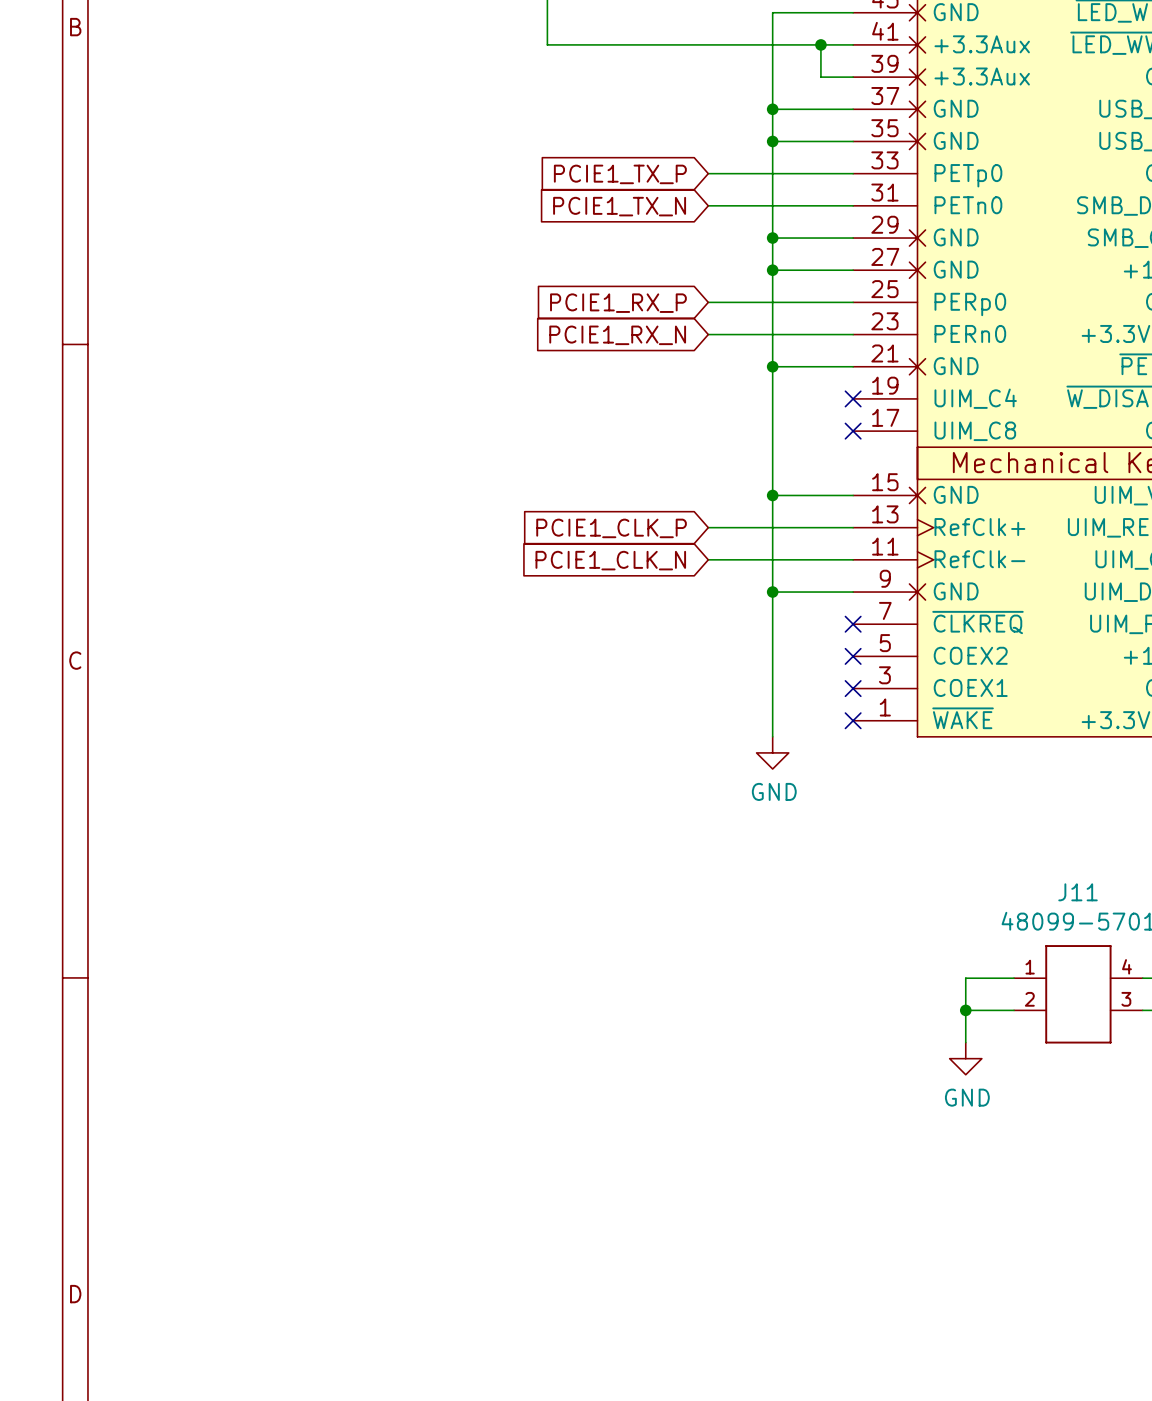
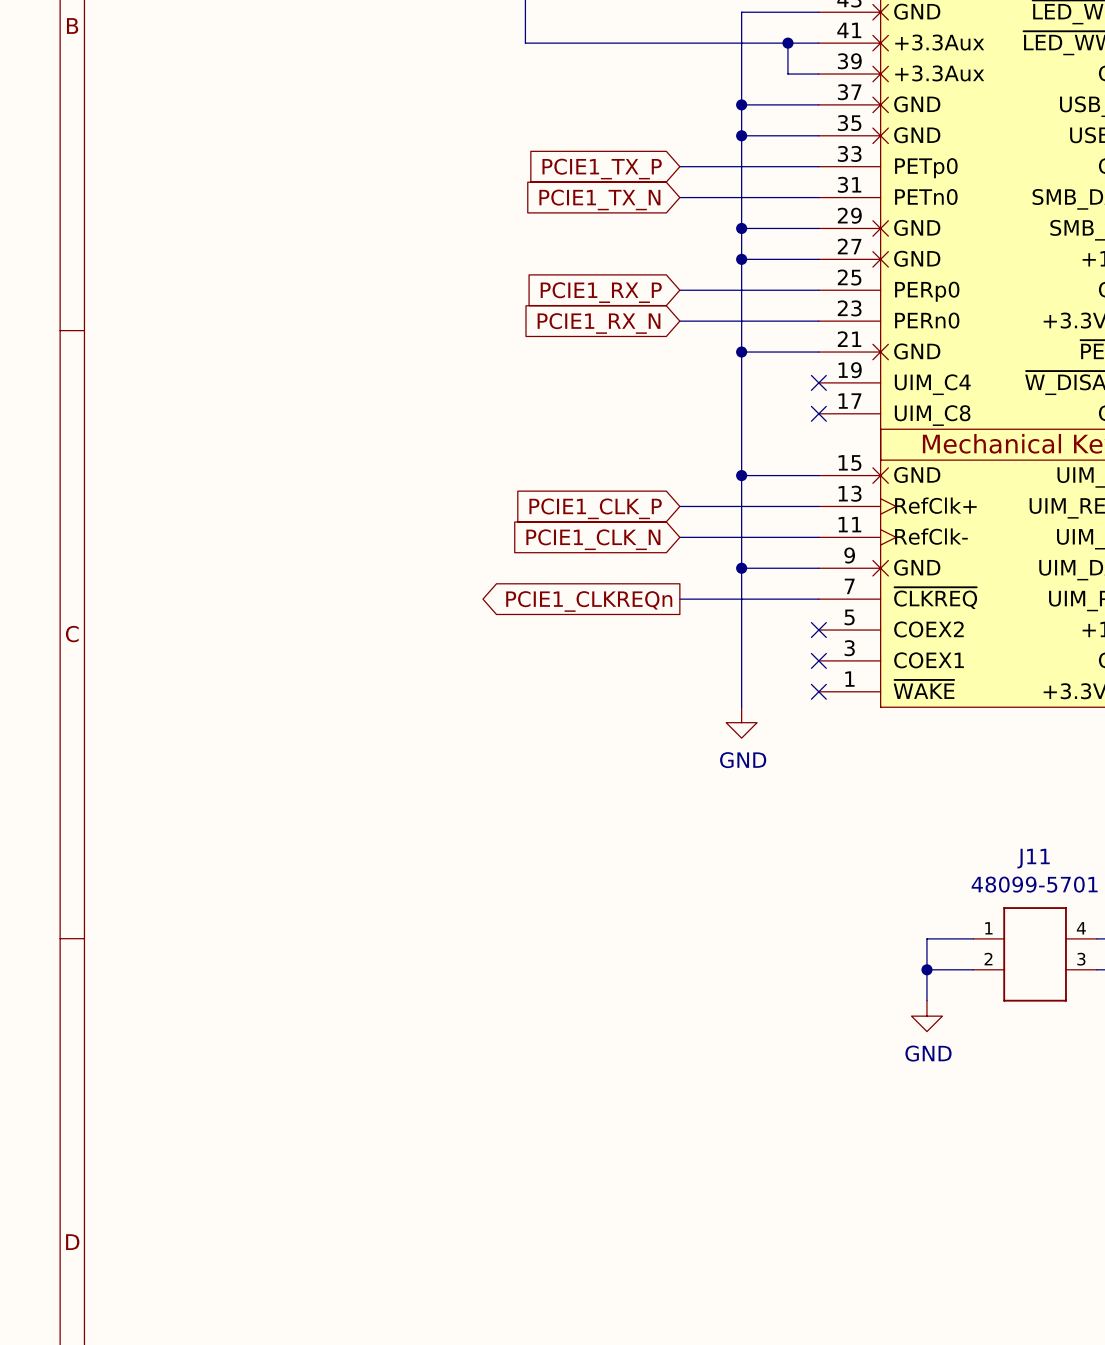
global label: none -> PCIE1_CLKREQn (589, 601)
wire: none -> (679, 599) (818, 599)
no-connect mark: (853, 624) -> none

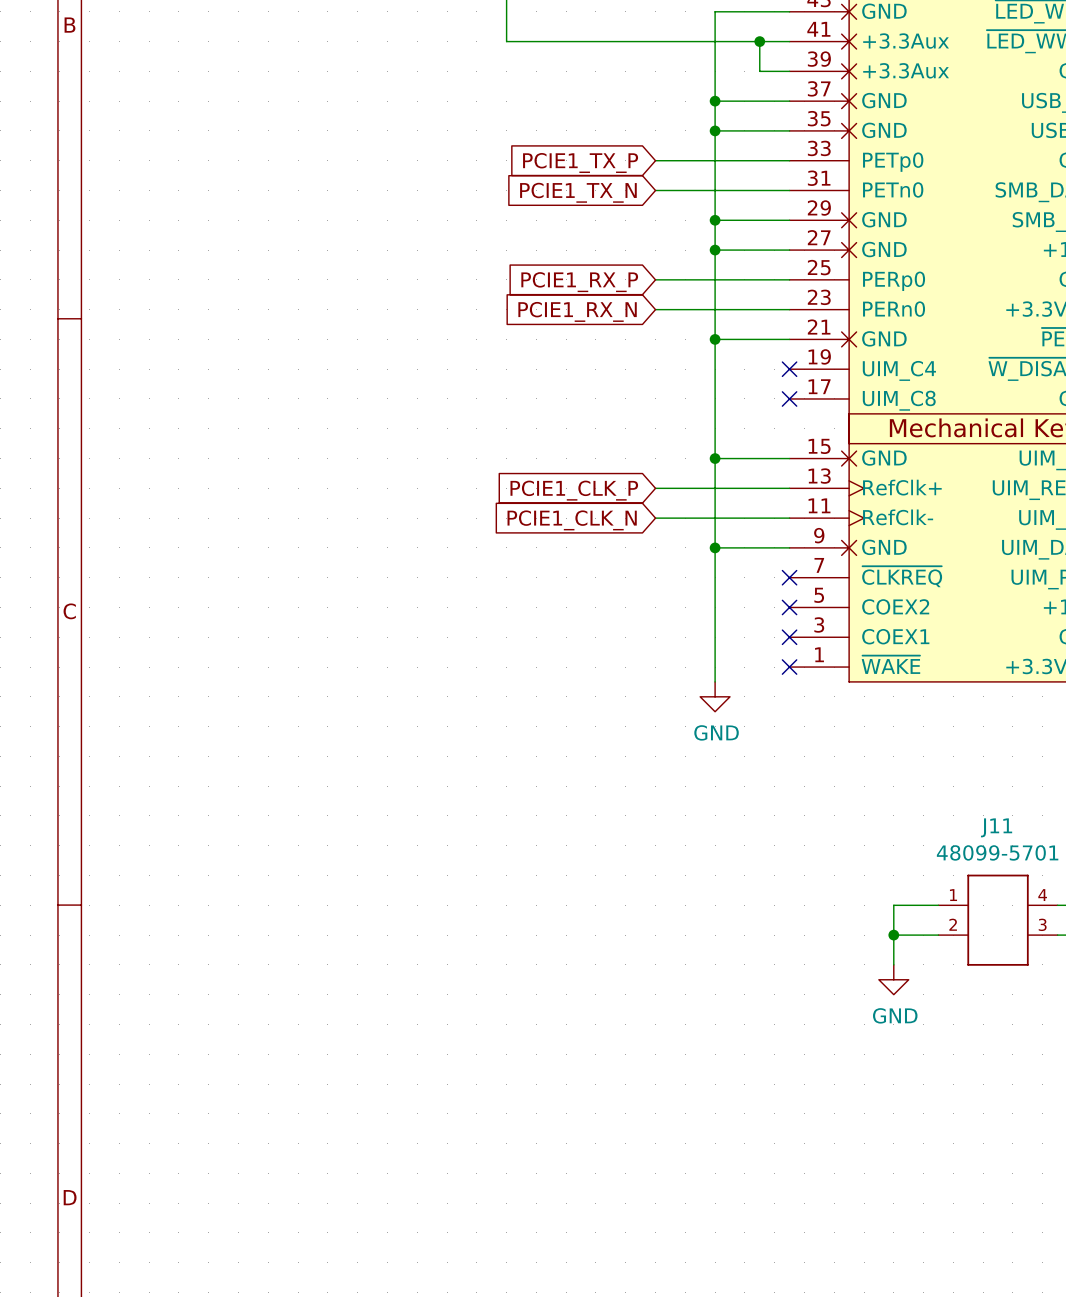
wire: (679, 599) (818, 599) -> none
no-connect mark: none -> (789, 577)
global label: PCIE1_CLKREQn (589, 601) -> none

